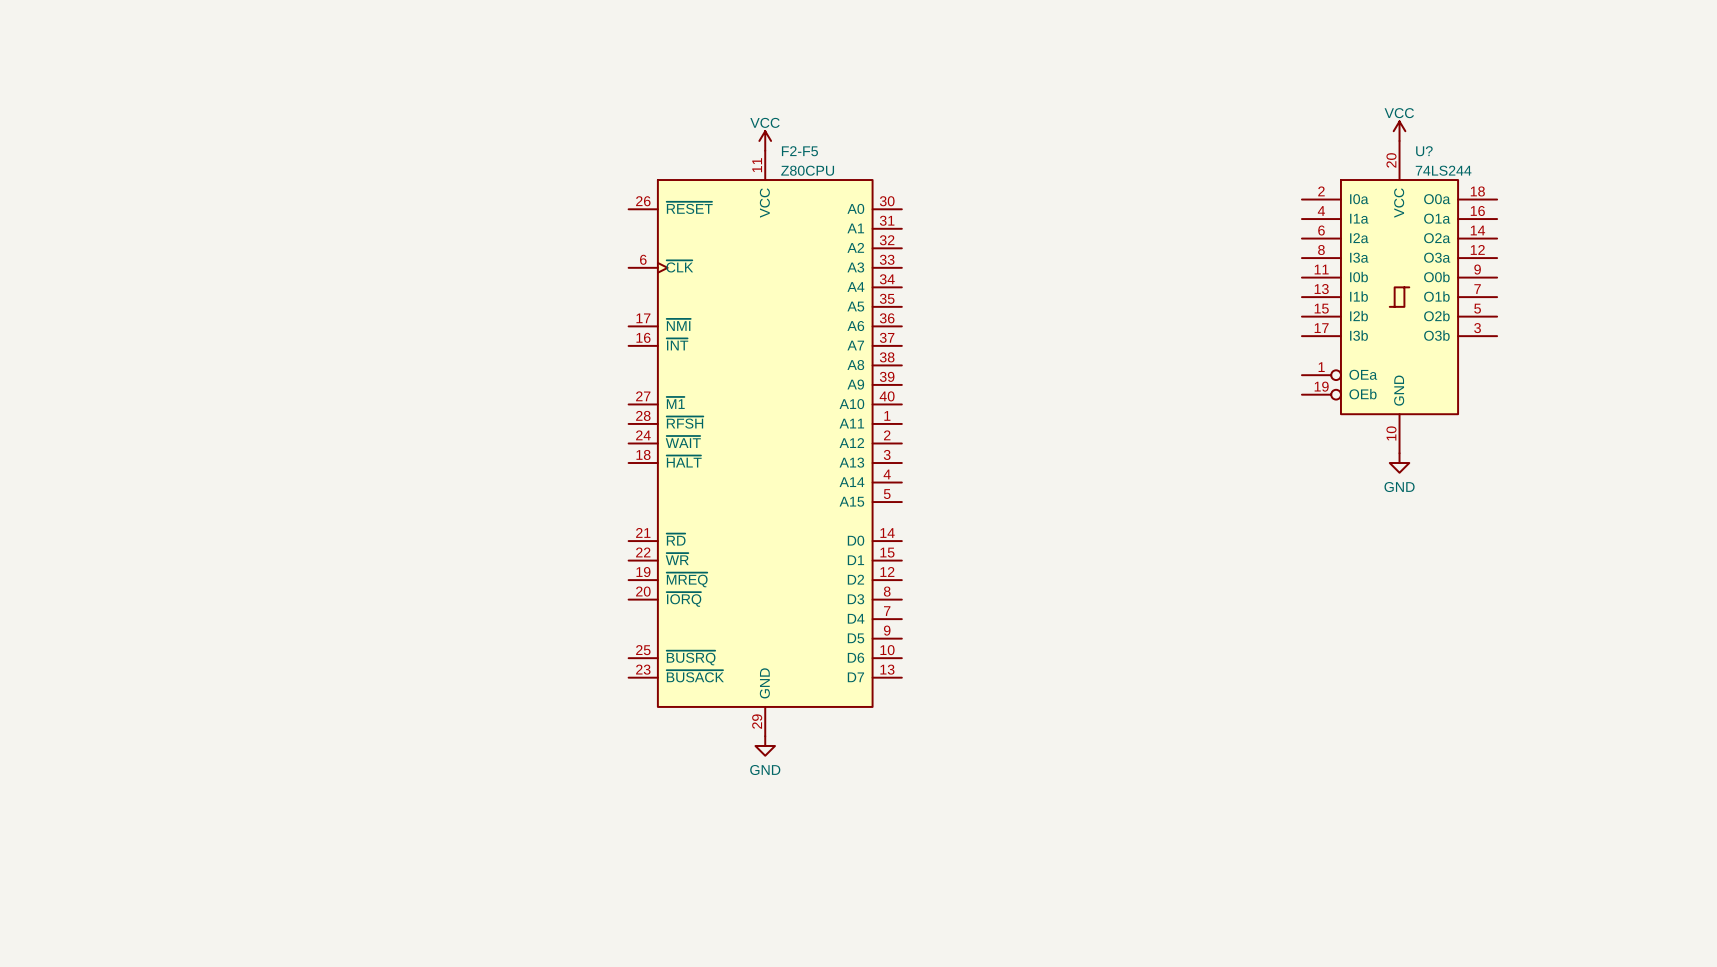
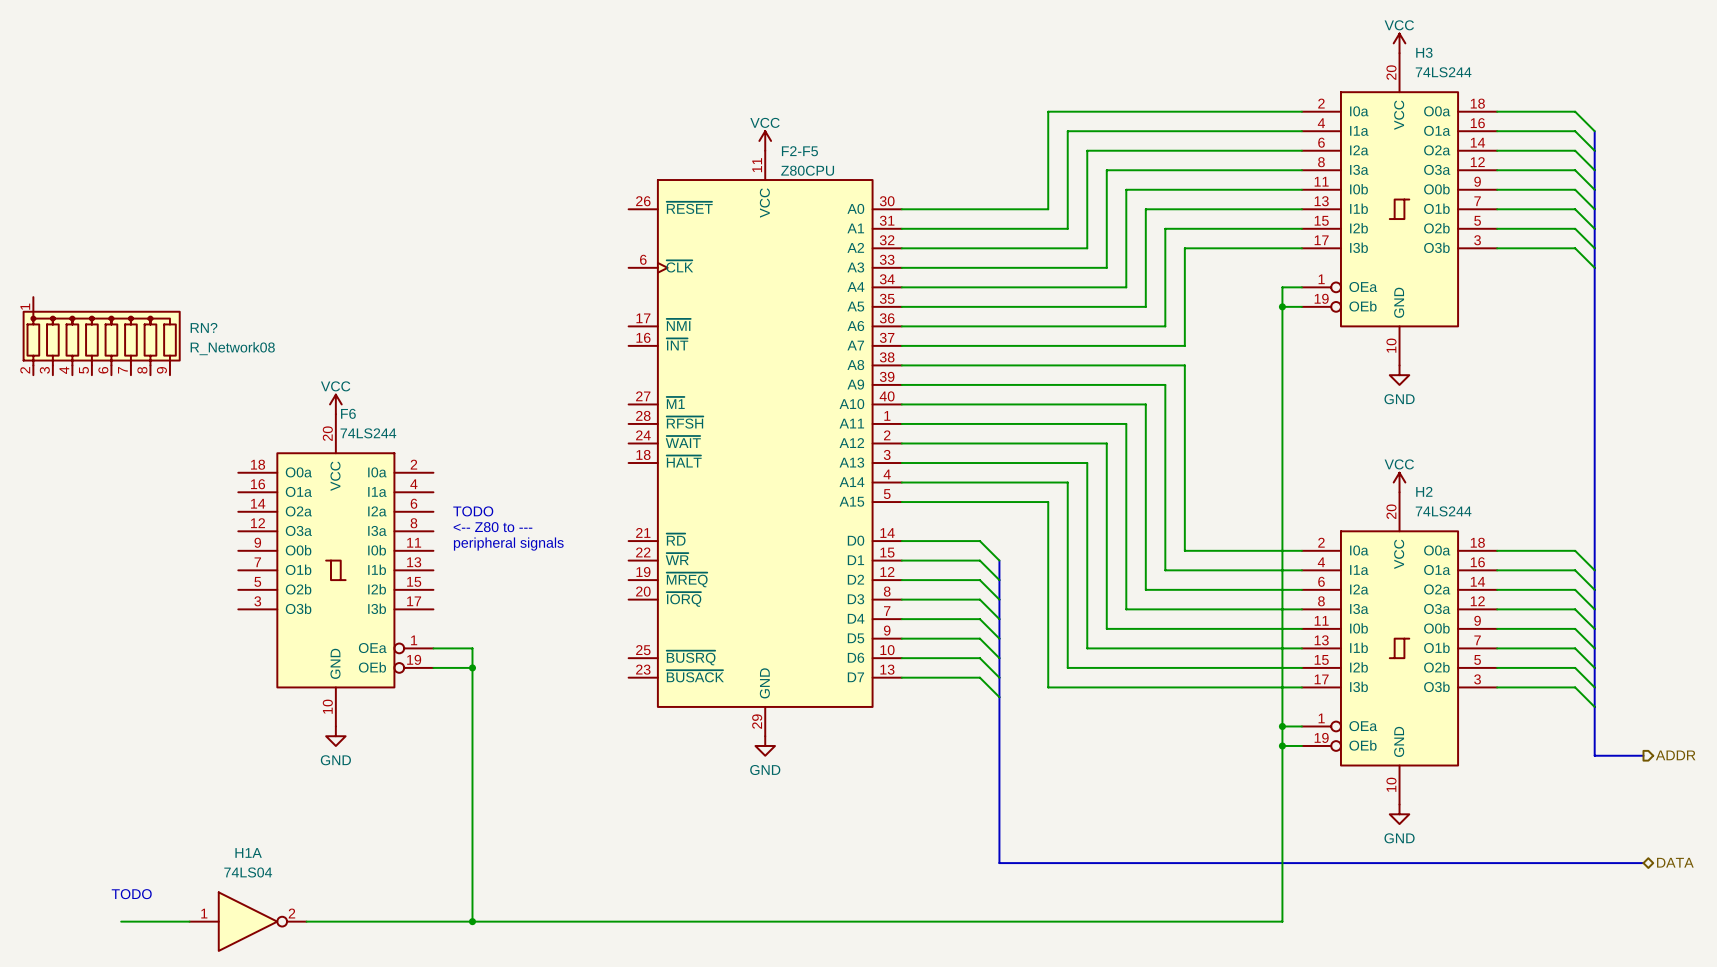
wire: none -> (1301, 111) (1048, 111) (1048, 209) (901, 209)
wire: none -> (1497, 111) (1575, 111) (1594, 131)
wire: none -> (1301, 131) (1067, 131) (1067, 228) (901, 228)
power symbol position: VCC (1399, 131) -> VCC (1399, 43)
wire: none -> (1497, 131) (1575, 131) (1594, 150)
bus: none -> (1594, 131) (1594, 755) (1643, 755)
wire: none -> (1301, 150) (1087, 150) (1087, 248) (901, 248)
wire: none -> (1497, 150) (1575, 150) (1594, 170)
wire: none -> (1301, 170) (1106, 170) (1106, 267) (901, 267)
wire: none -> (1497, 170) (1575, 170) (1594, 189)
wire: none -> (1301, 189) (1126, 189) (1126, 287) (901, 287)
wire: none -> (1497, 189) (1575, 189) (1594, 209)
wire: none -> (1301, 209) (1145, 209) (1145, 306) (901, 306)
H3: none -> 74LS244 (1399, 209)
wire: none -> (1497, 209) (1575, 209) (1594, 228)
wire: none -> (1301, 228) (1165, 228) (1165, 326) (901, 326)
wire: none -> (1497, 228) (1575, 228) (1594, 248)
wire: none -> (1301, 248) (1184, 248) (1184, 345) (901, 345)
wire: none -> (1497, 248) (1575, 248) (1594, 267)
wire: none -> (1301, 287) (1282, 287) (1282, 921) (306, 921)
U?: 74LS244 (1399, 297) -> none
wire: none -> (1282, 306) (1301, 306)
junction: none -> (1282, 306)
RN?: none -> R_Network08 (101, 336)
wire: none -> (901, 365) (1184, 365) (1184, 550) (1301, 550)
wire: none -> (901, 384) (1165, 384) (1165, 570) (1301, 570)
power symbol: none -> VCC (335, 404)
wire: none -> (901, 404) (1145, 404) (1145, 589) (1301, 589)
wire: none -> (901, 423) (1126, 423) (1126, 609) (1301, 609)
wire: none -> (901, 443) (1106, 443) (1106, 628) (1301, 628)
wire: none -> (901, 463) (1087, 463) (1087, 648) (1301, 648)
power symbol position: GND (1399, 463) -> GND (1399, 375)
wire: none -> (901, 482) (1067, 482) (1067, 667) (1301, 667)
power symbol: none -> VCC (1399, 482)
wire: none -> (901, 502) (1048, 502) (1048, 687) (1301, 687)
text: none -> TODO (473, 511)
text: none -> <-- Z80 to --- (493, 527)
wire: none -> (901, 541) (979, 541) (999, 560)
text: none -> peripheral signals (508, 544)
wire: none -> (1497, 550) (1575, 550) (1594, 570)
wire: none -> (901, 560) (979, 560) (999, 580)
bus: none -> (999, 560) (999, 863) (1643, 863)
F6: none -> 74LS244 (335, 570)
wire: none -> (1497, 570) (1575, 570) (1594, 589)
wire: none -> (901, 580) (979, 580) (999, 599)
wire: none -> (1497, 589) (1575, 589) (1594, 609)
wire: none -> (901, 599) (979, 599) (999, 619)
wire: none -> (1497, 609) (1575, 609) (1594, 628)
wire: none -> (901, 619) (979, 619) (999, 638)
wire: none -> (1497, 628) (1575, 628) (1594, 648)
wire: none -> (901, 638) (979, 638) (999, 658)
wire: none -> (433, 648) (472, 648) (472, 921)
H2: none -> 74LS244 (1399, 648)
wire: none -> (1497, 648) (1575, 648) (1594, 667)
wire: none -> (901, 658) (979, 658) (999, 677)
wire: none -> (433, 667) (472, 667)
junction: none -> (472, 667)
wire: none -> (1497, 667) (1575, 667) (1594, 687)
wire: none -> (901, 677) (979, 677) (999, 697)
wire: none -> (1497, 687) (1575, 687) (1594, 706)
wire: none -> (1282, 726) (1301, 726)
junction: none -> (1282, 726)
power symbol: none -> GND (335, 736)
wire: none -> (1282, 745) (1301, 745)
junction: none -> (1282, 745)
hierarchical label: none -> ADDR (1675, 755)
power symbol: none -> GND (1399, 814)
hierarchical label: none -> DATA (1675, 862)
text: none -> TODO (131, 894)
wire: none -> (121, 921) (189, 921)
H1A: none -> 74LS04 (248, 921)
junction: none -> (472, 921)

